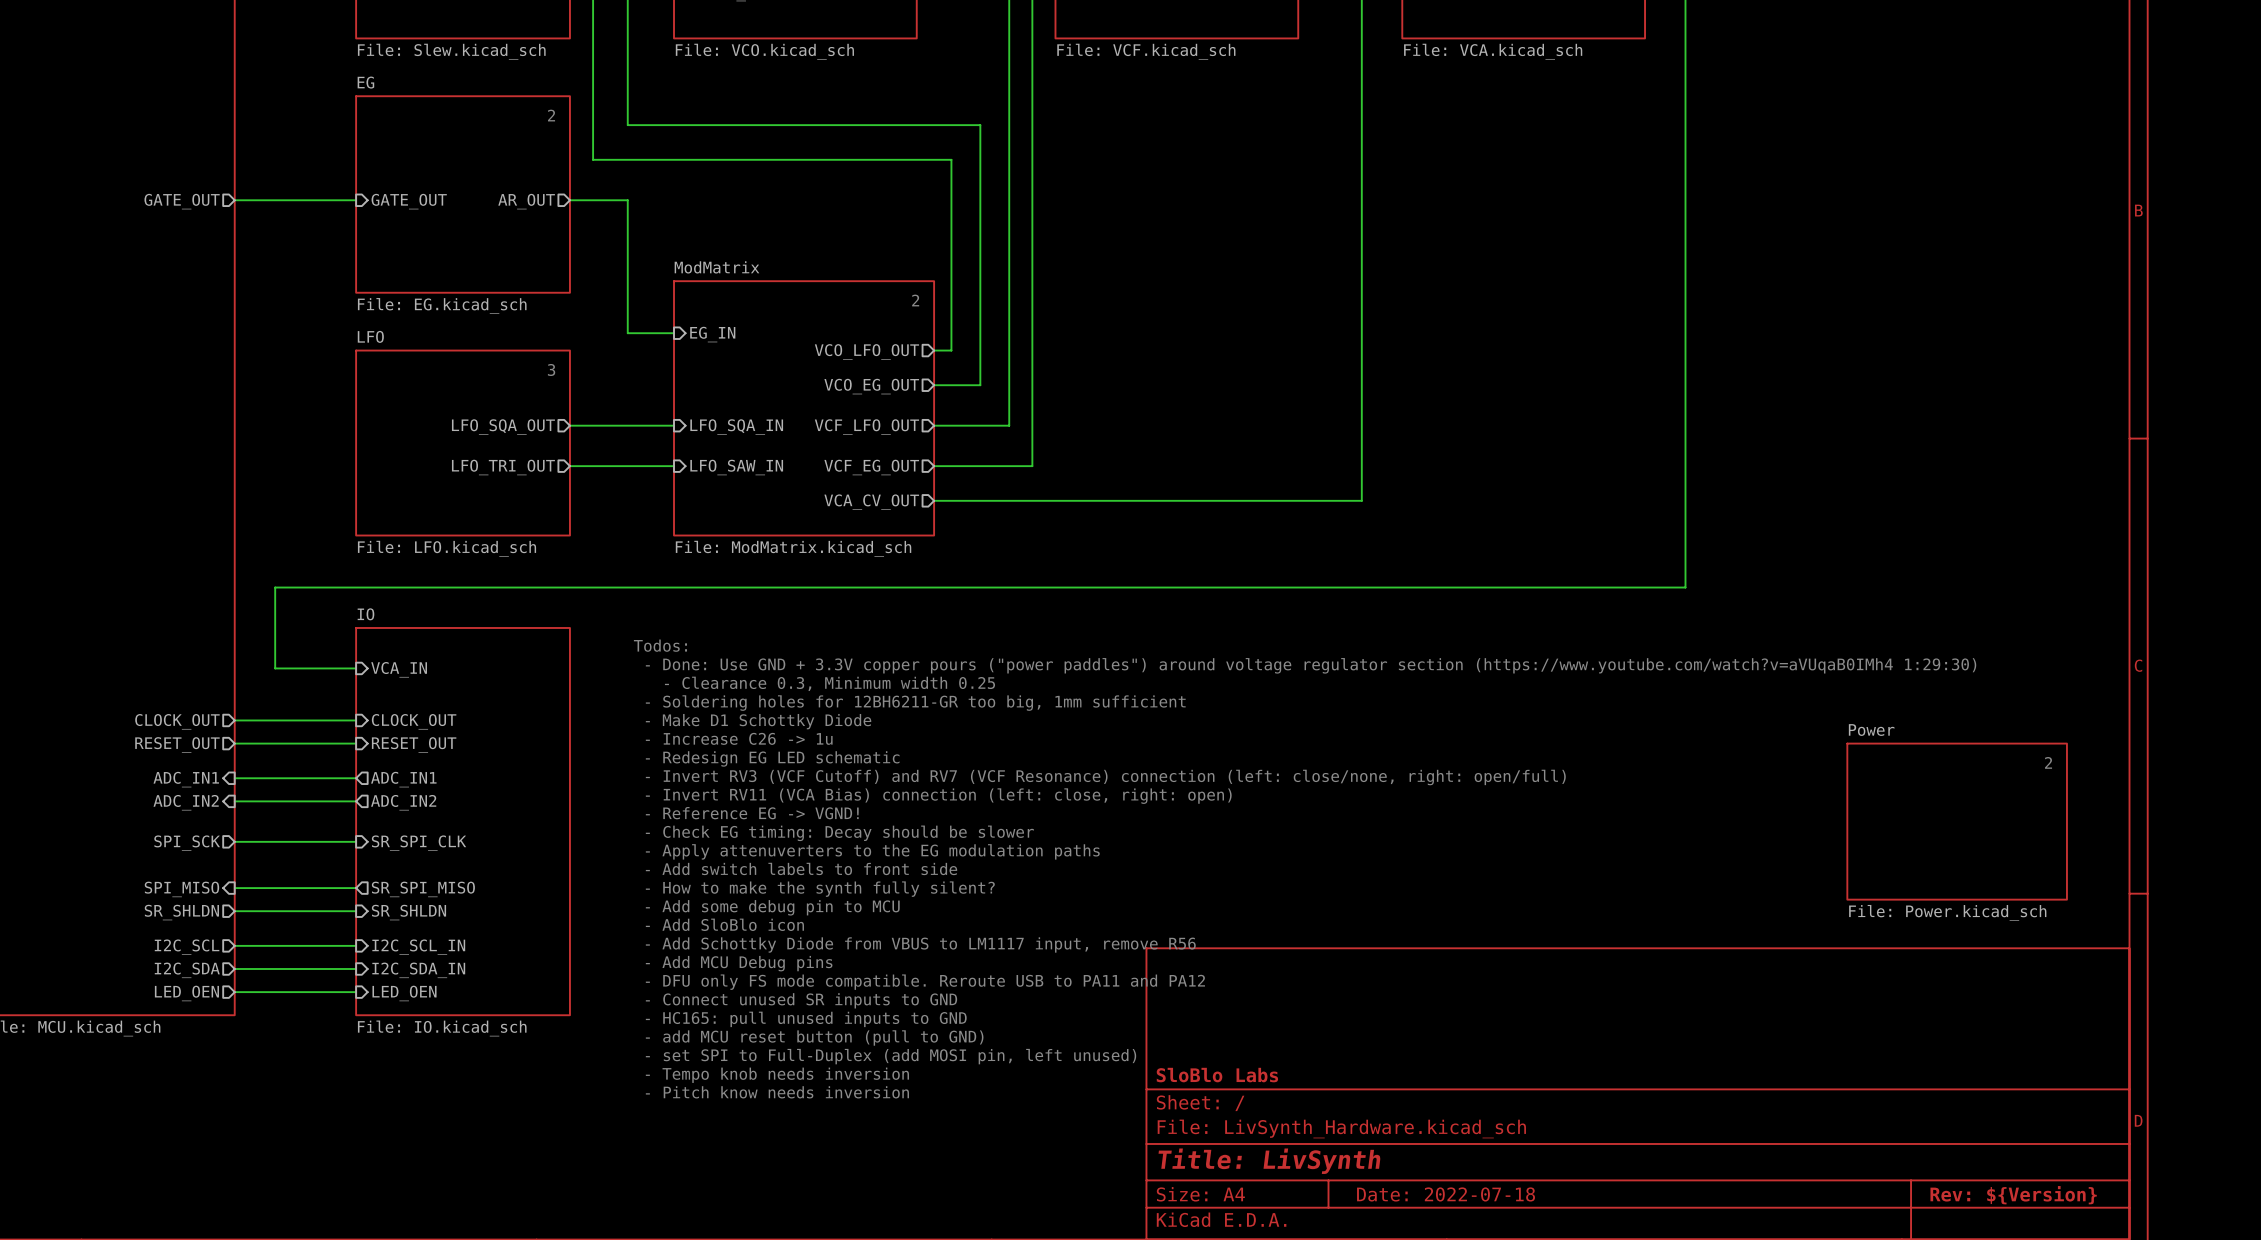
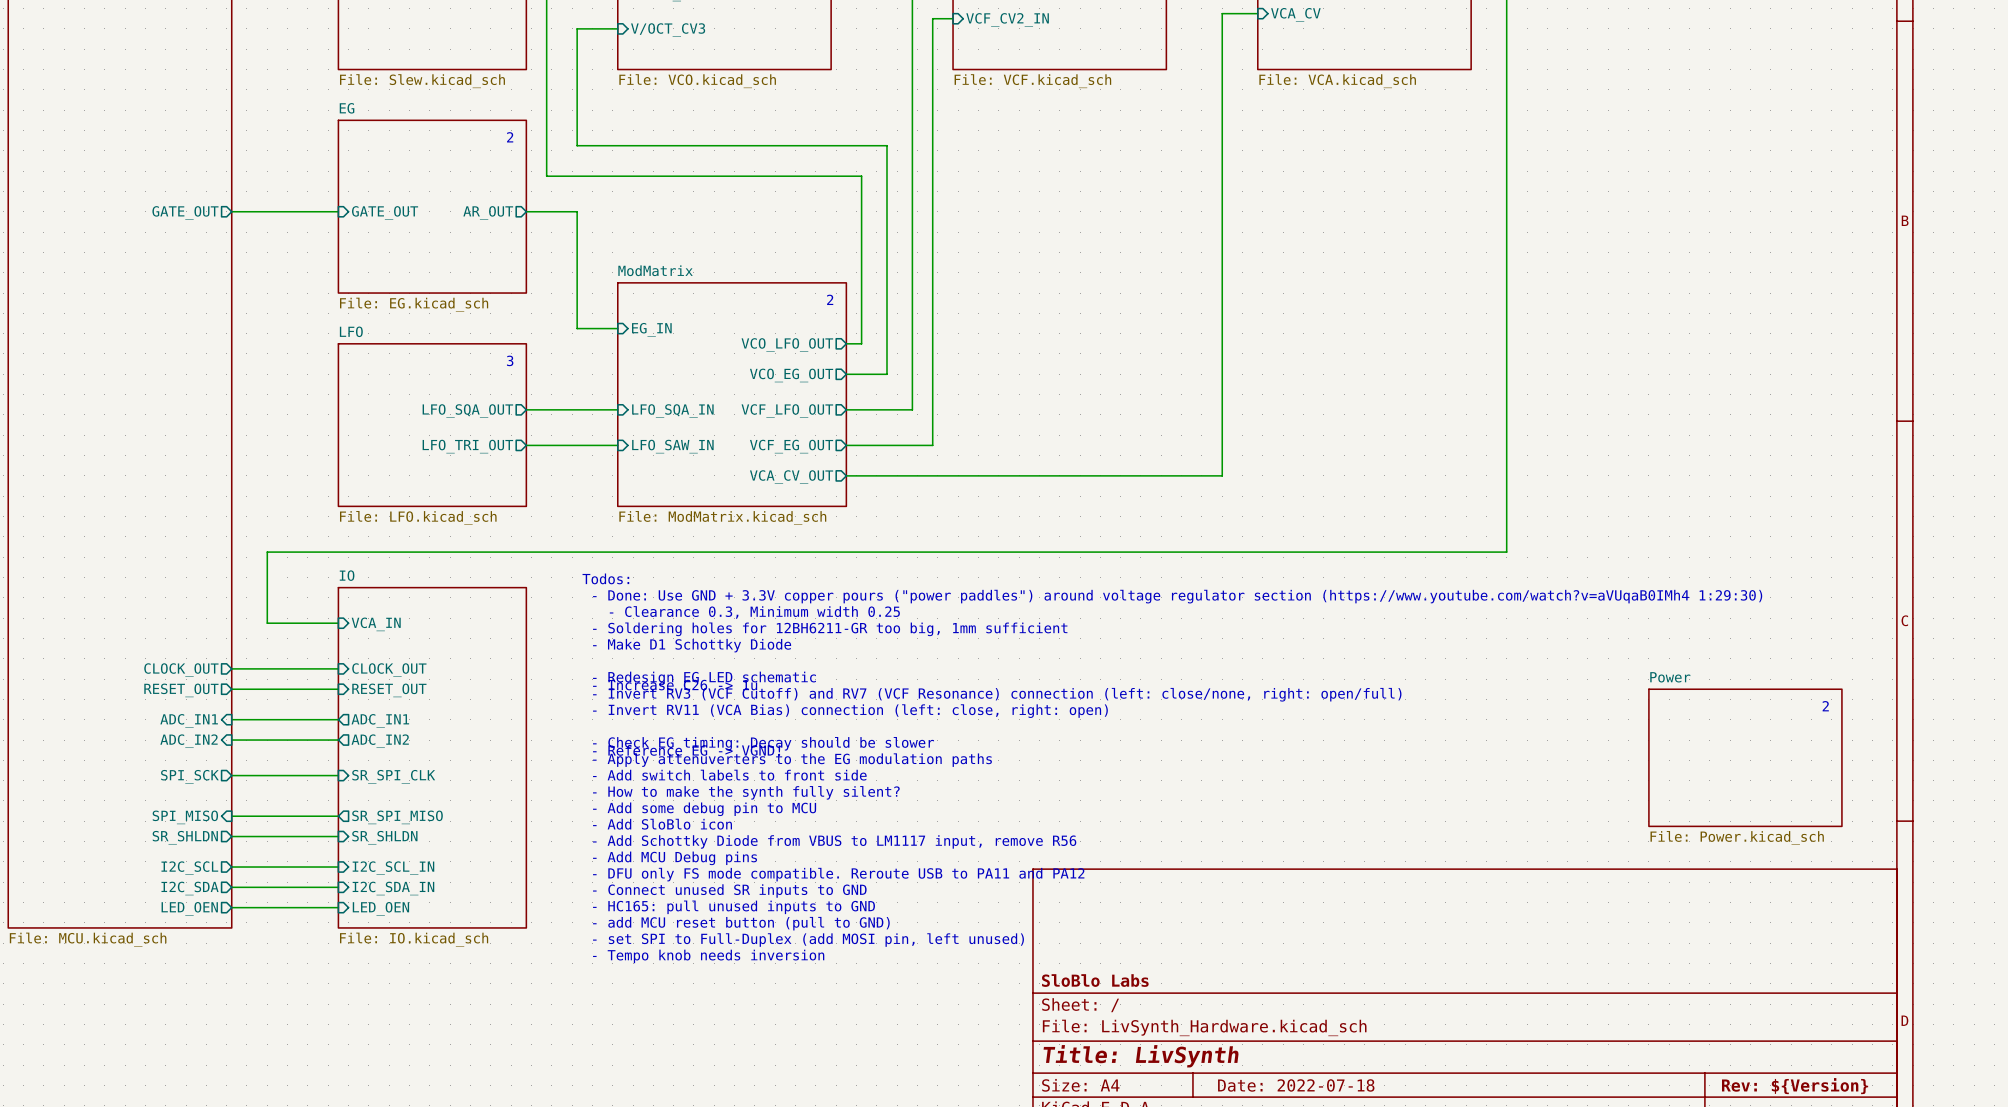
text position: Todos: (660, 645) -> Todos: (605, 578)
text position: - Done: Use GND + 3.3V copper pours ("power paddles") around voltage regulator section (https://www.youtube.com/watch?v=aVUqaB0IMh4 1:29:30) (1311, 665) -> - Done: Use GND + 3.3V copper pours ("power paddles") around voltage regulator section (https://www.youtube.com/watch?v=aVUqaB0IMh4 1:29:30) (1177, 596)
text position: - Clearance 0.3, Minimum width 0.25 (829, 683) -> - Clearance 0.3, Minimum width 0.25 (754, 612)
text position: - Soldering holes for 12BH6211-GR too big, 1mm sufficient (915, 703) -> - Soldering holes for 12BH6211-GR too big, 1mm sufficient (830, 629)
text position: - Make D1 Schottky Diode (758, 721) -> - Make D1 Schottky Diode (692, 645)
text position: - Redesign EG LED schematic (772, 758) -> - Redesign EG LED schematic (704, 678)
text position: - Invert RV3 (VCF Cutoff) and RV7 (VCF Resonance) connection (left: close/none, right: open/full) (1105, 777) -> - Invert RV3 (VCF Cutoff) and RV7 (VCF Resonance) connection (left: close/none, right: open/full) (997, 694)
text position: - Invert RV11 (VCA Bias) connection (left: close, right: open) (938, 796) -> - Invert RV11 (VCA Bias) connection (left: close, right: open) (850, 711)
text position: - Check EG timing: Decay should be slower (839, 833) -> - Check EG timing: Decay should be slower (763, 743)
text position: - Apply attenuverters to the EG modulation paths (872, 851) -> - Apply attenuverters to the EG modulation paths (792, 760)
text position: - Add switch labels to front side (801, 868) -> - Add switch labels to front side (729, 775)
text position: - How to make the synth fully silent? (820, 889) -> - How to make the synth fully silent? (746, 792)
text position: - Add some debug pin to MCU (772, 907) -> - Add some debug pin to MCU (704, 809)
text position: - Add SloBlo icon (724, 924) -> - Add SloBlo icon (662, 824)
text position: - Add Schottky Diode from VBUS to LM1117 input, remove R56 (920, 944) -> - Add Schottky Diode from VBUS to LM1117 input, remove R56 (834, 841)
text position: - Add MCU Debug pins (739, 963) -> - Add MCU Debug pins (675, 858)
text position: - DFU only FS mode compatible. Reroute USB to PA11 and PA12 (925, 982) -> - DFU only FS mode compatible. Reroute USB to PA11 and PA12 (838, 874)
text position: - Connect unused SR inputs to GND (801, 1000) -> - Connect unused SR inputs to GND (729, 891)
text position: - HC165: pull unused inputs to GND (806, 1019) -> - HC165: pull unused inputs to GND (734, 907)
text position: - add MCU reset button (pull to GND) (814, 1038) -> - add MCU reset button (pull to GND) (741, 923)
text position: - set SPI to Full-Duplex (add MOSI pin, left unused) (891, 1056) -> - set SPI to Full-Duplex (add MOSI pin, left unused) (808, 940)
text position: - Tempo knob needs inversion (777, 1075) -> - Tempo knob needs inversion (708, 956)
text: - Pitch know needs inversion (777, 1092) -> none

